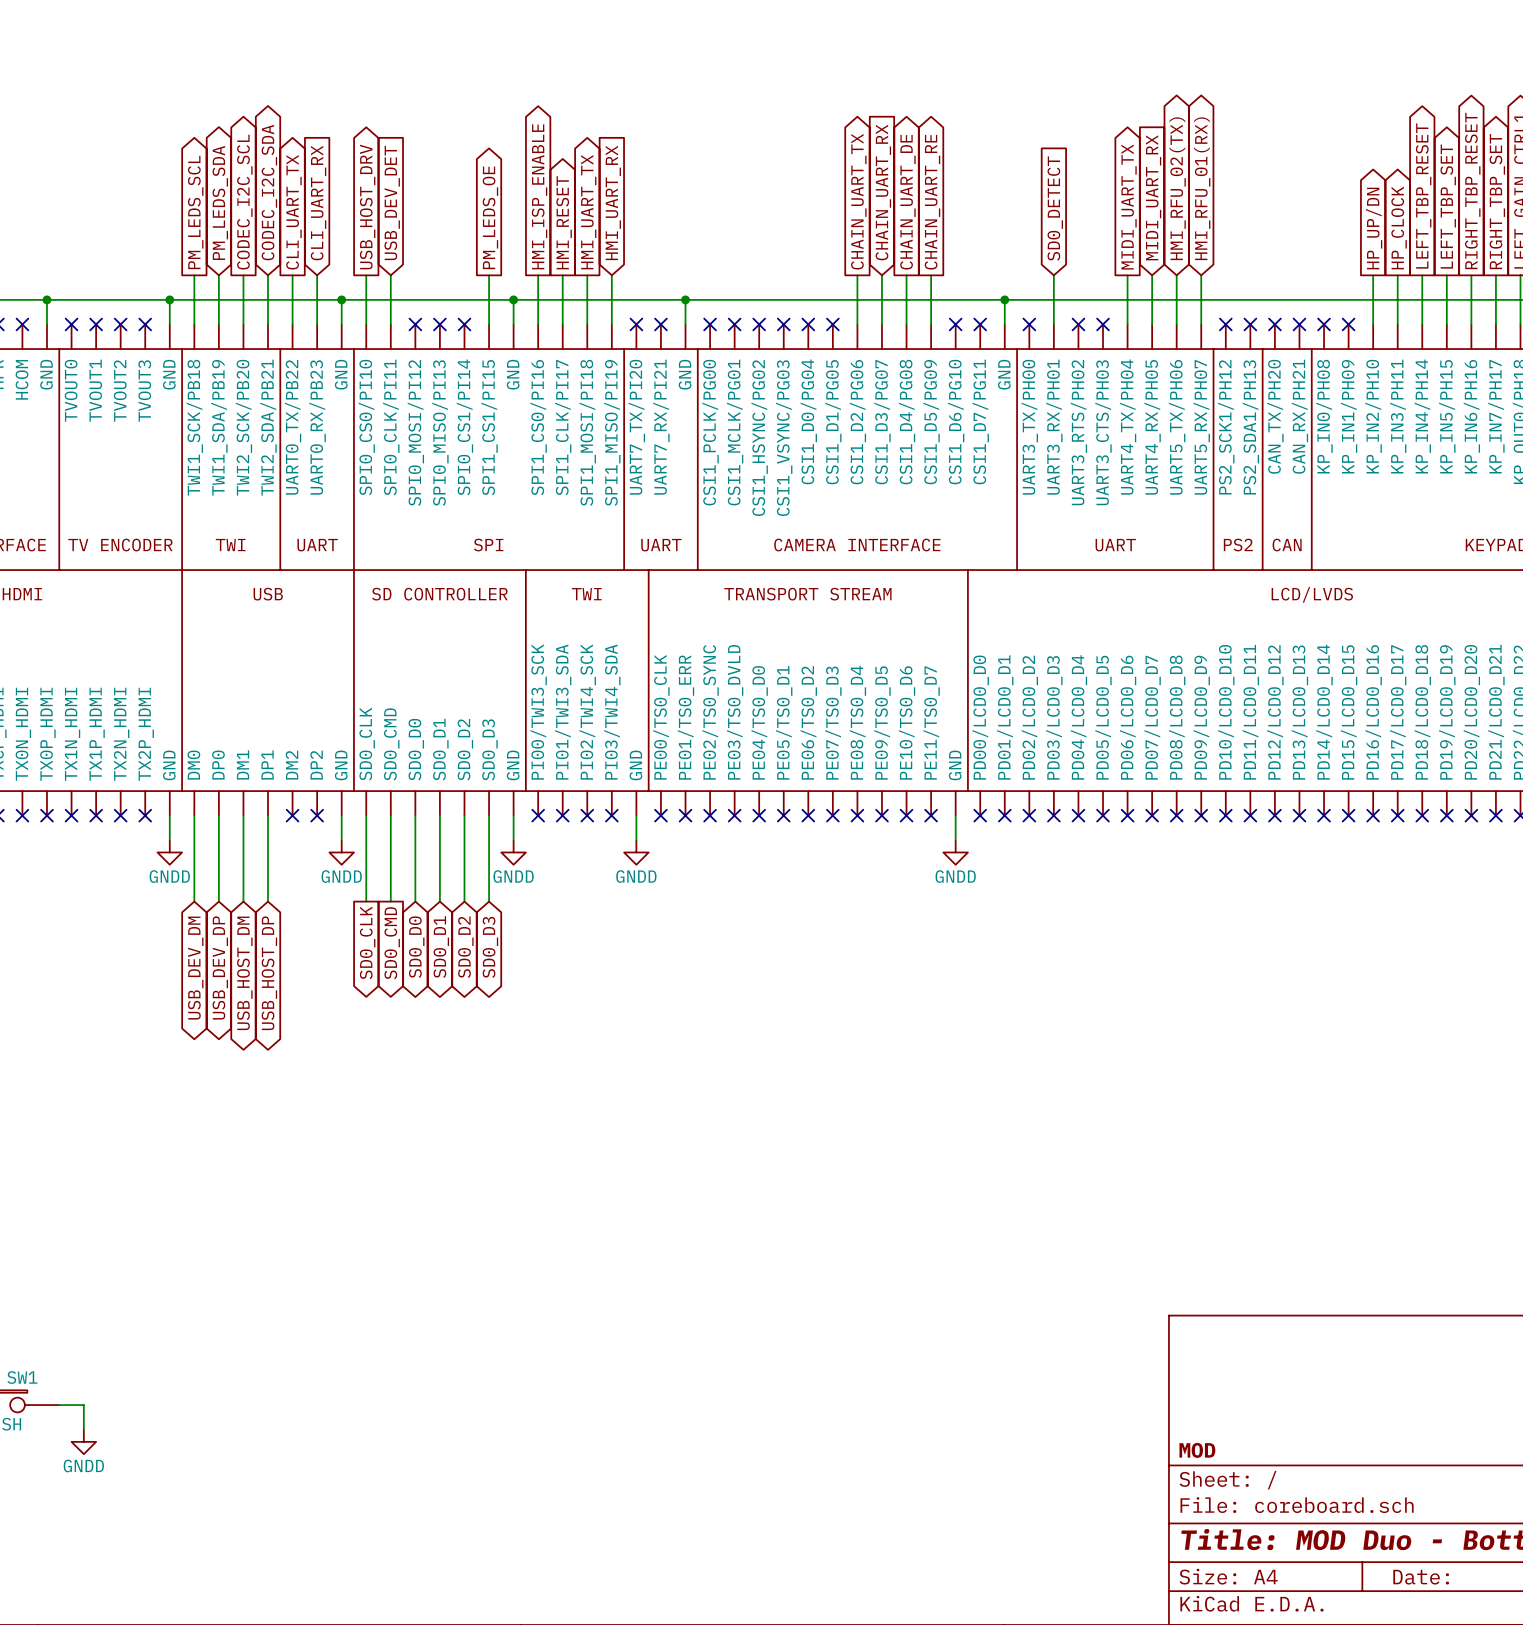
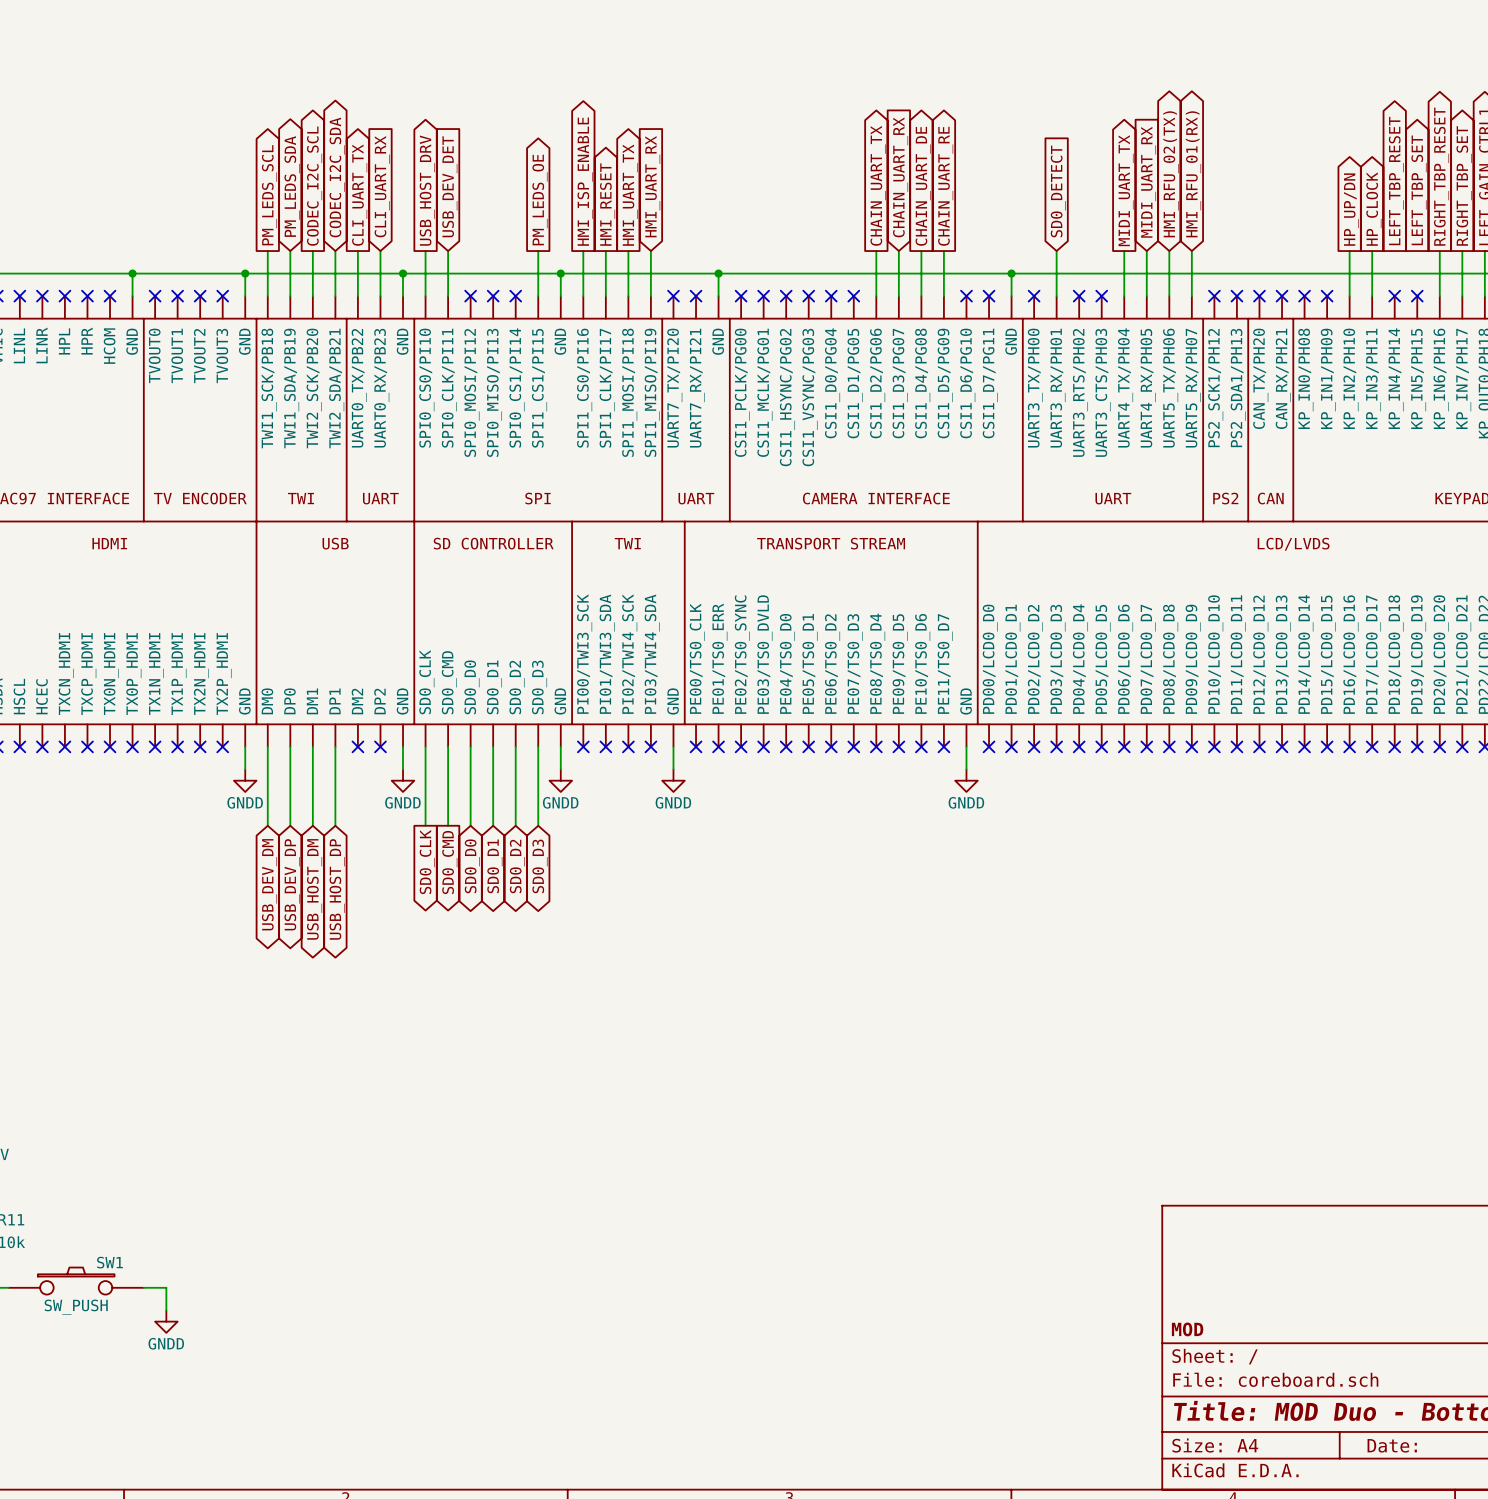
wire: (1422, 275) (1422, 324) -> none
wire: (1446, 275) (1446, 324) -> none
no-connect mark: none -> (1394, 296)
no-connect mark: none -> (1417, 296)

